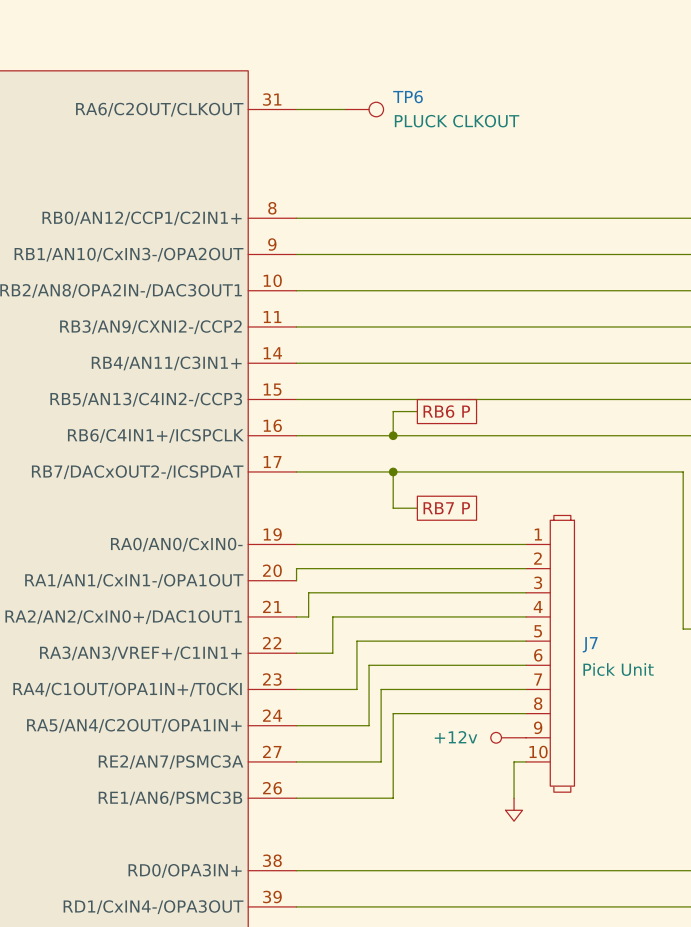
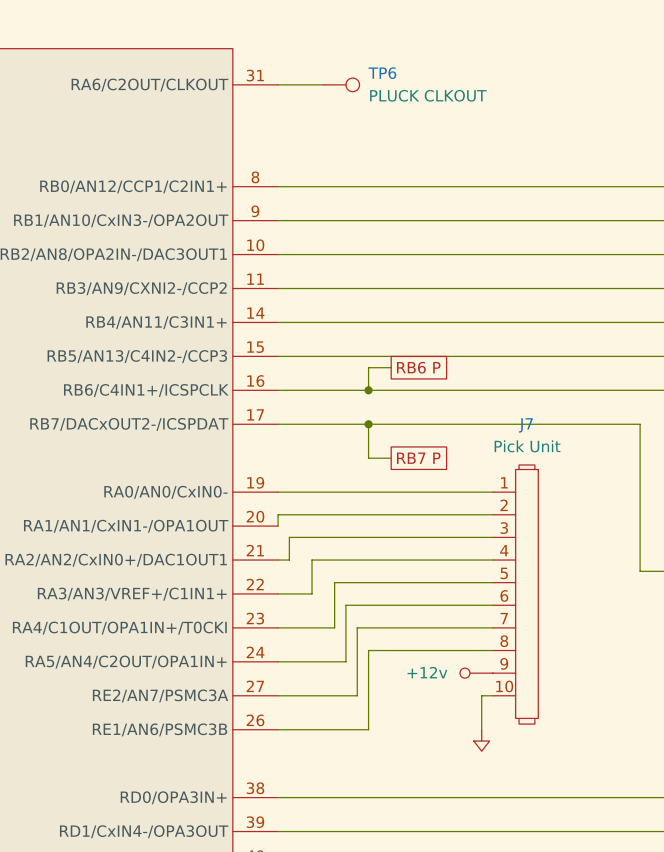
J7 name position: J7 (590, 644) -> J7 (525, 425)
J7 value position: Pick Unit (618, 669) -> Pick Unit (527, 446)

